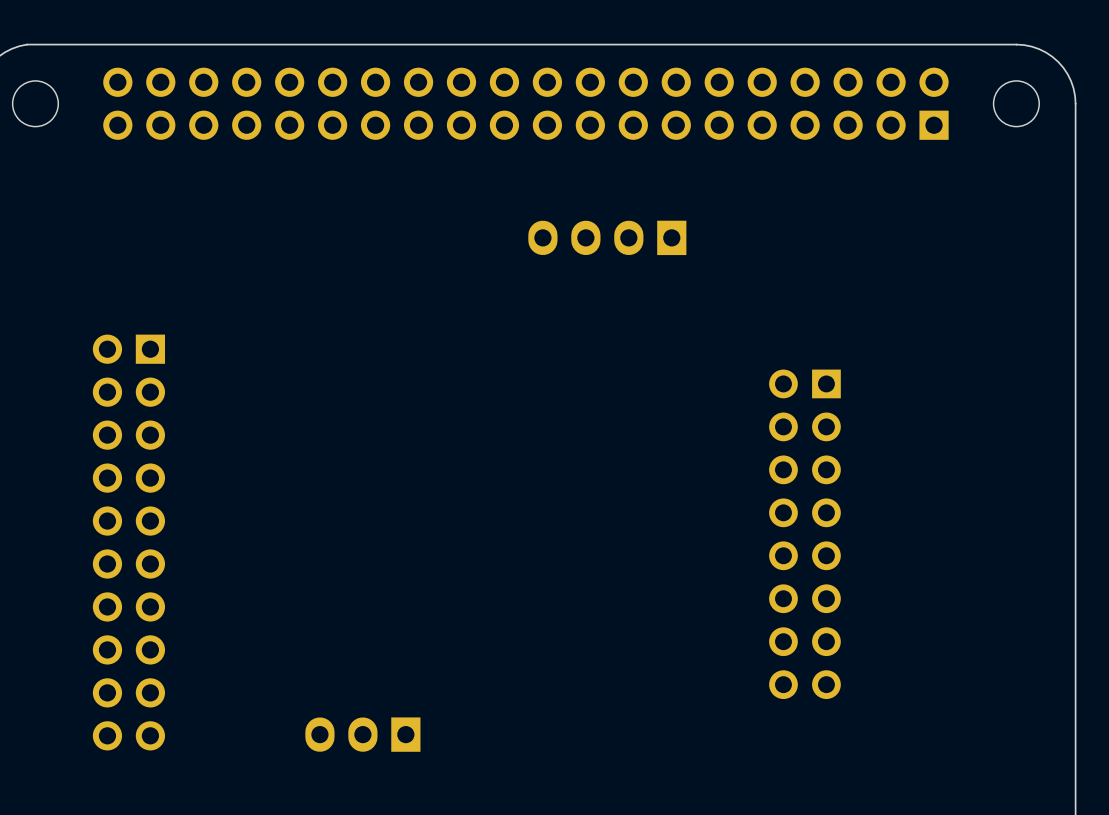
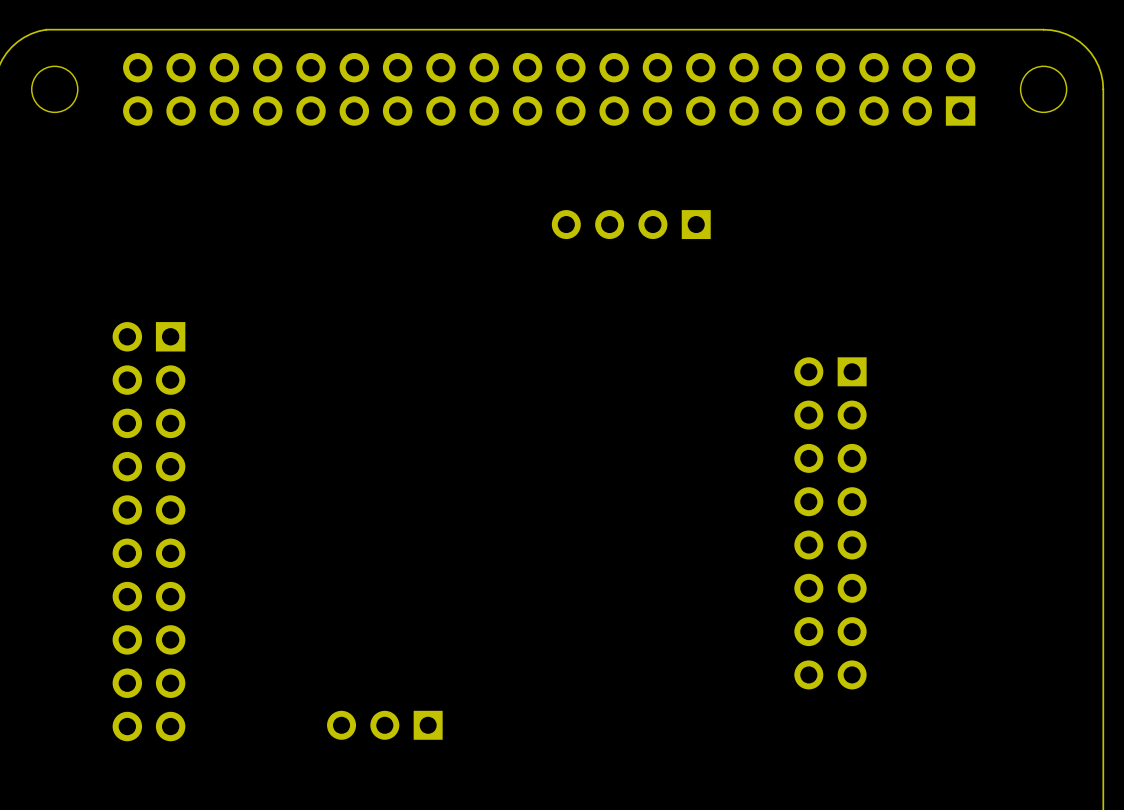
part footprint: [528, 220, 687, 256] -> [551, 210, 711, 240]
part footprint: [305, 717, 421, 752] -> [327, 710, 443, 740]

